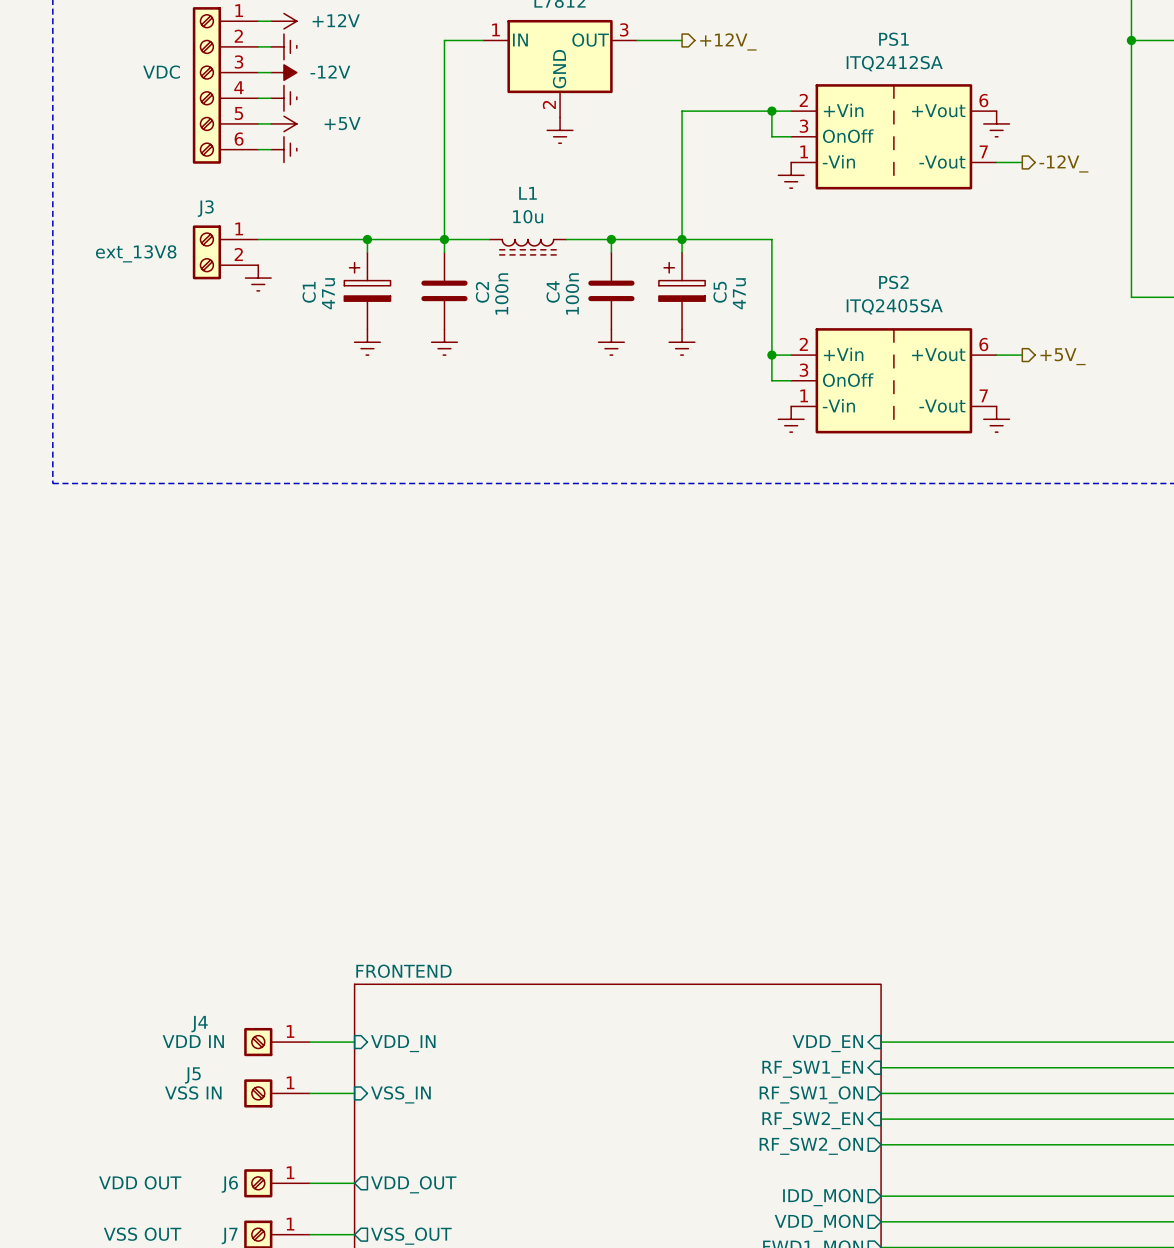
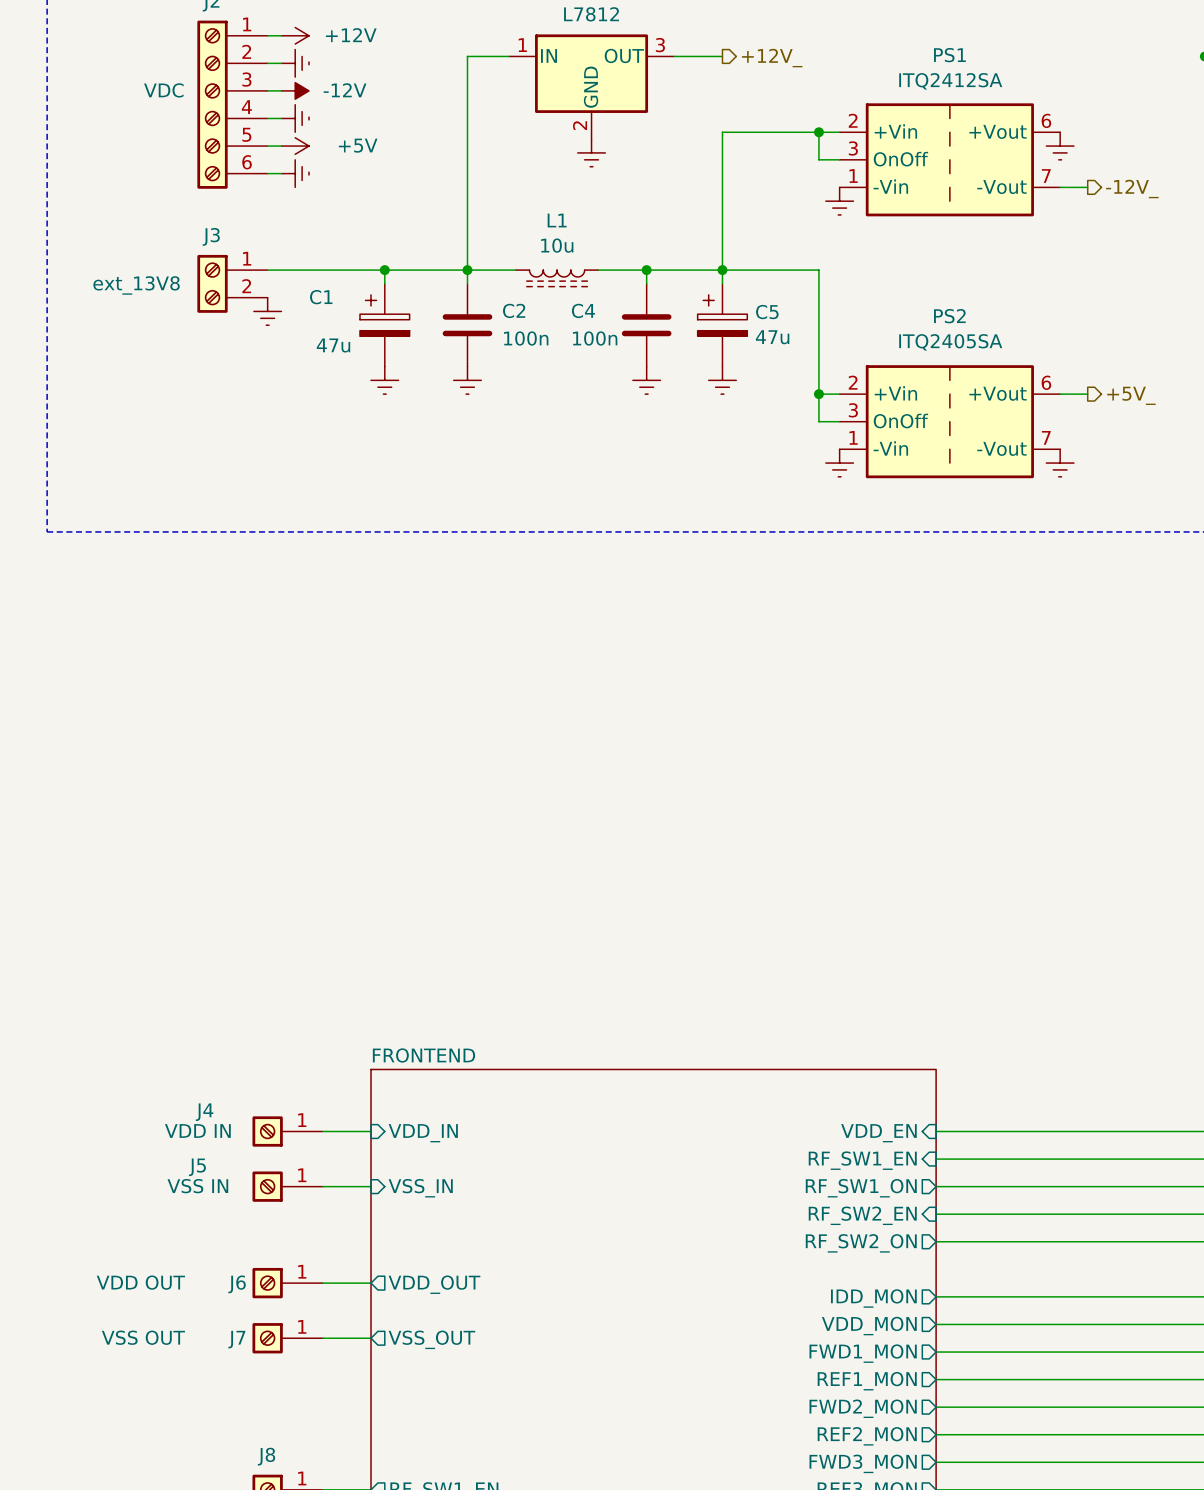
C4 name rotation: 0° (553, 291) -> 90° clockwise (583, 310)
C1 name rotation: 0° (309, 292) -> 90° clockwise (321, 297)
C2 name rotation: 0° (482, 292) -> 90° clockwise (514, 310)
C5 name rotation: 0° (720, 292) -> 90° clockwise (767, 312)
C1 value rotation: 0° (328, 293) -> 90° clockwise (333, 345)
C2 value rotation: 0° (501, 293) -> 90° clockwise (526, 338)
C4 value rotation: 0° (572, 293) -> 90° clockwise (595, 338)
C5 value rotation: 0° (739, 293) -> 90° clockwise (772, 337)

